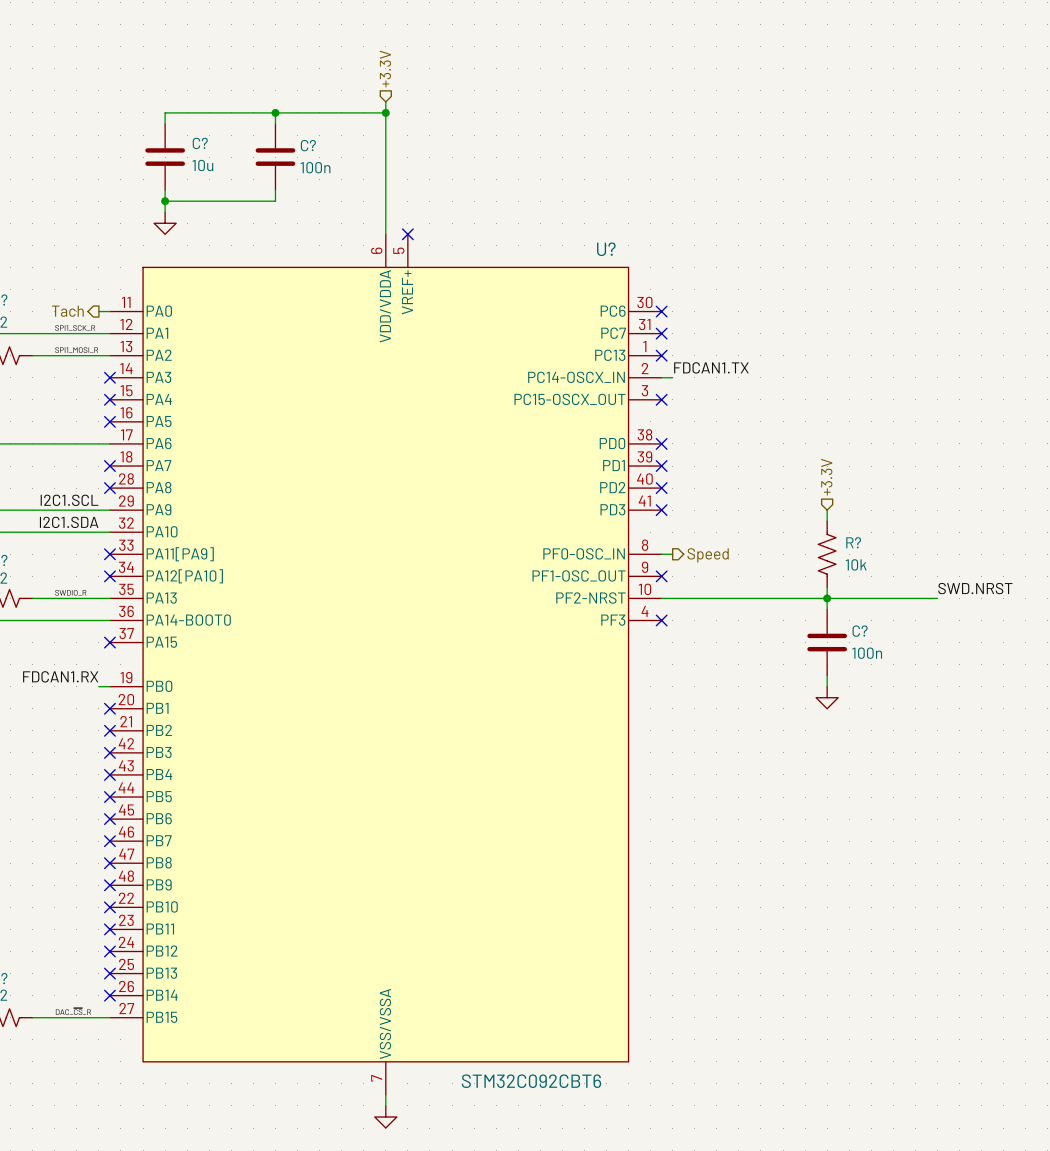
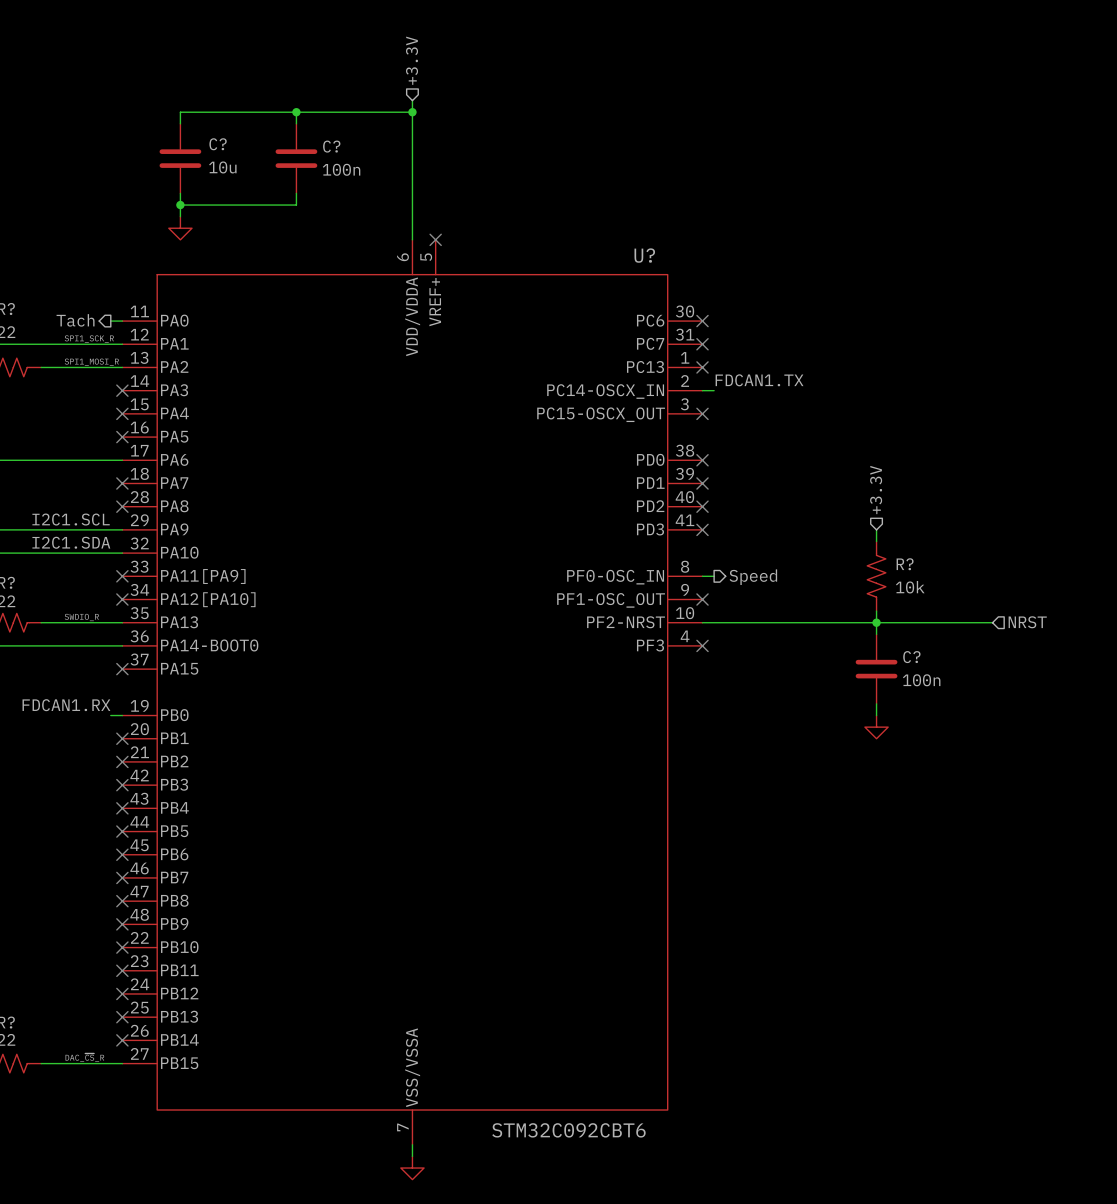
label: SWD.NRST (975, 588) -> none
hierarchical label: none -> NRST (1027, 622)

